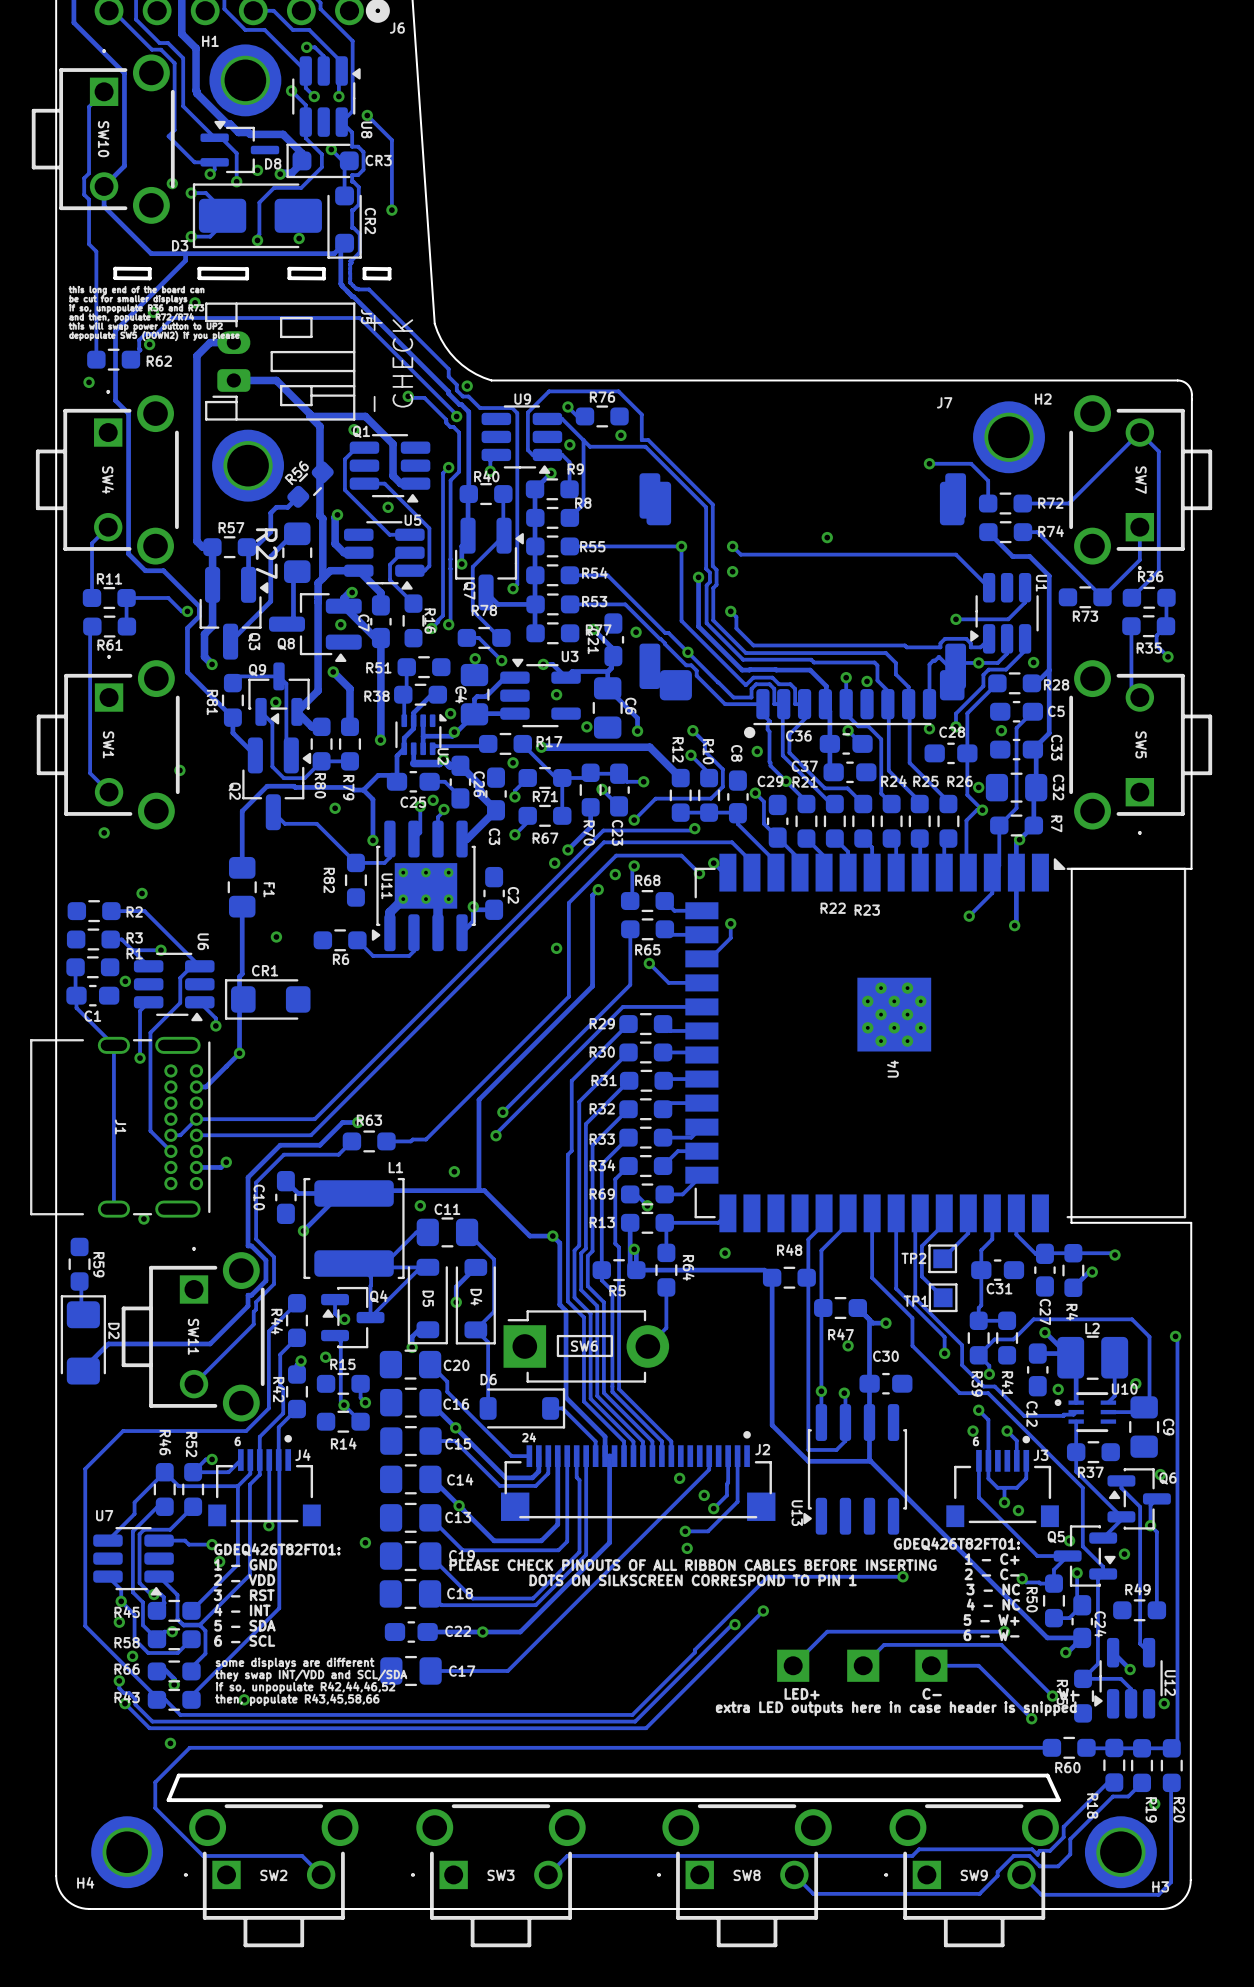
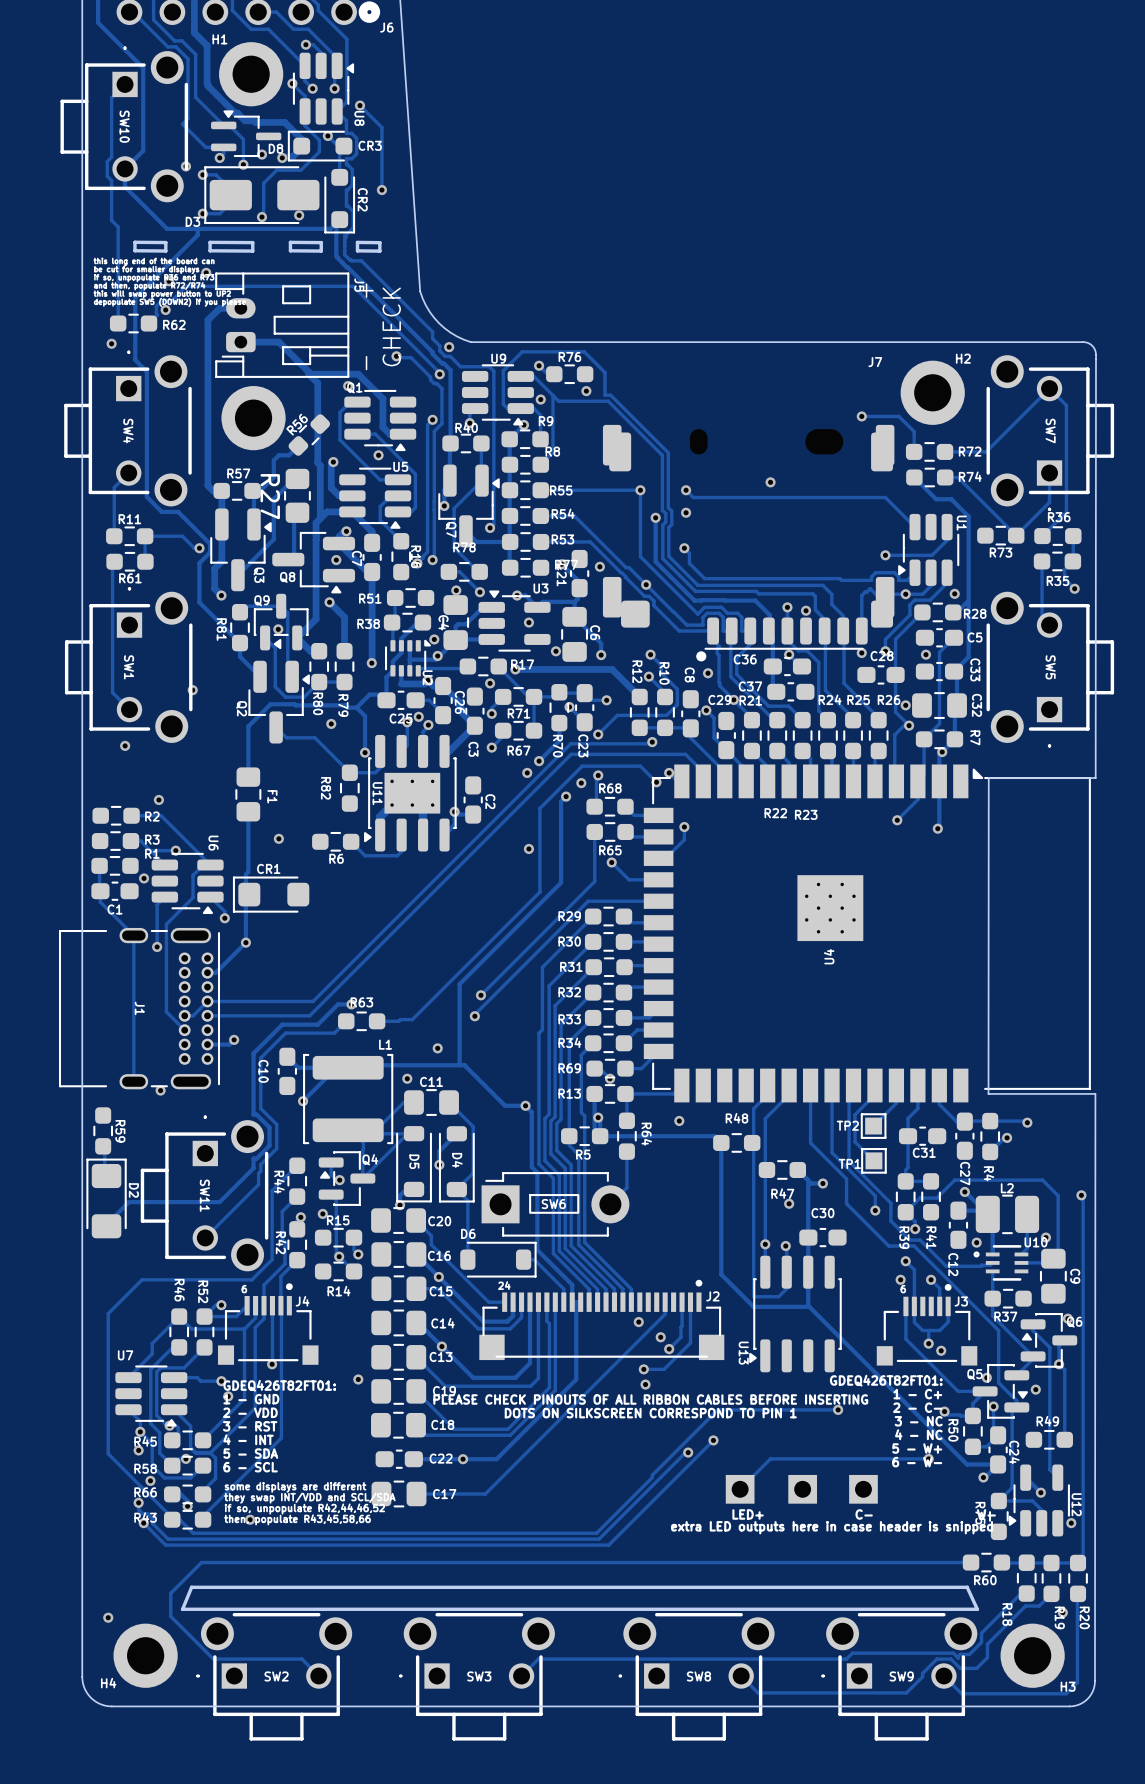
track: (863, 1665) (884, 1644) (1001, 1644) (1052, 1696) -> none
track: (931, 1665) (978, 1665) (1031, 1718) -> none
via: (1052, 1696) -> none
via: (1031, 1718) -> none
via position: (170, 1743) -> (108, 1617)

